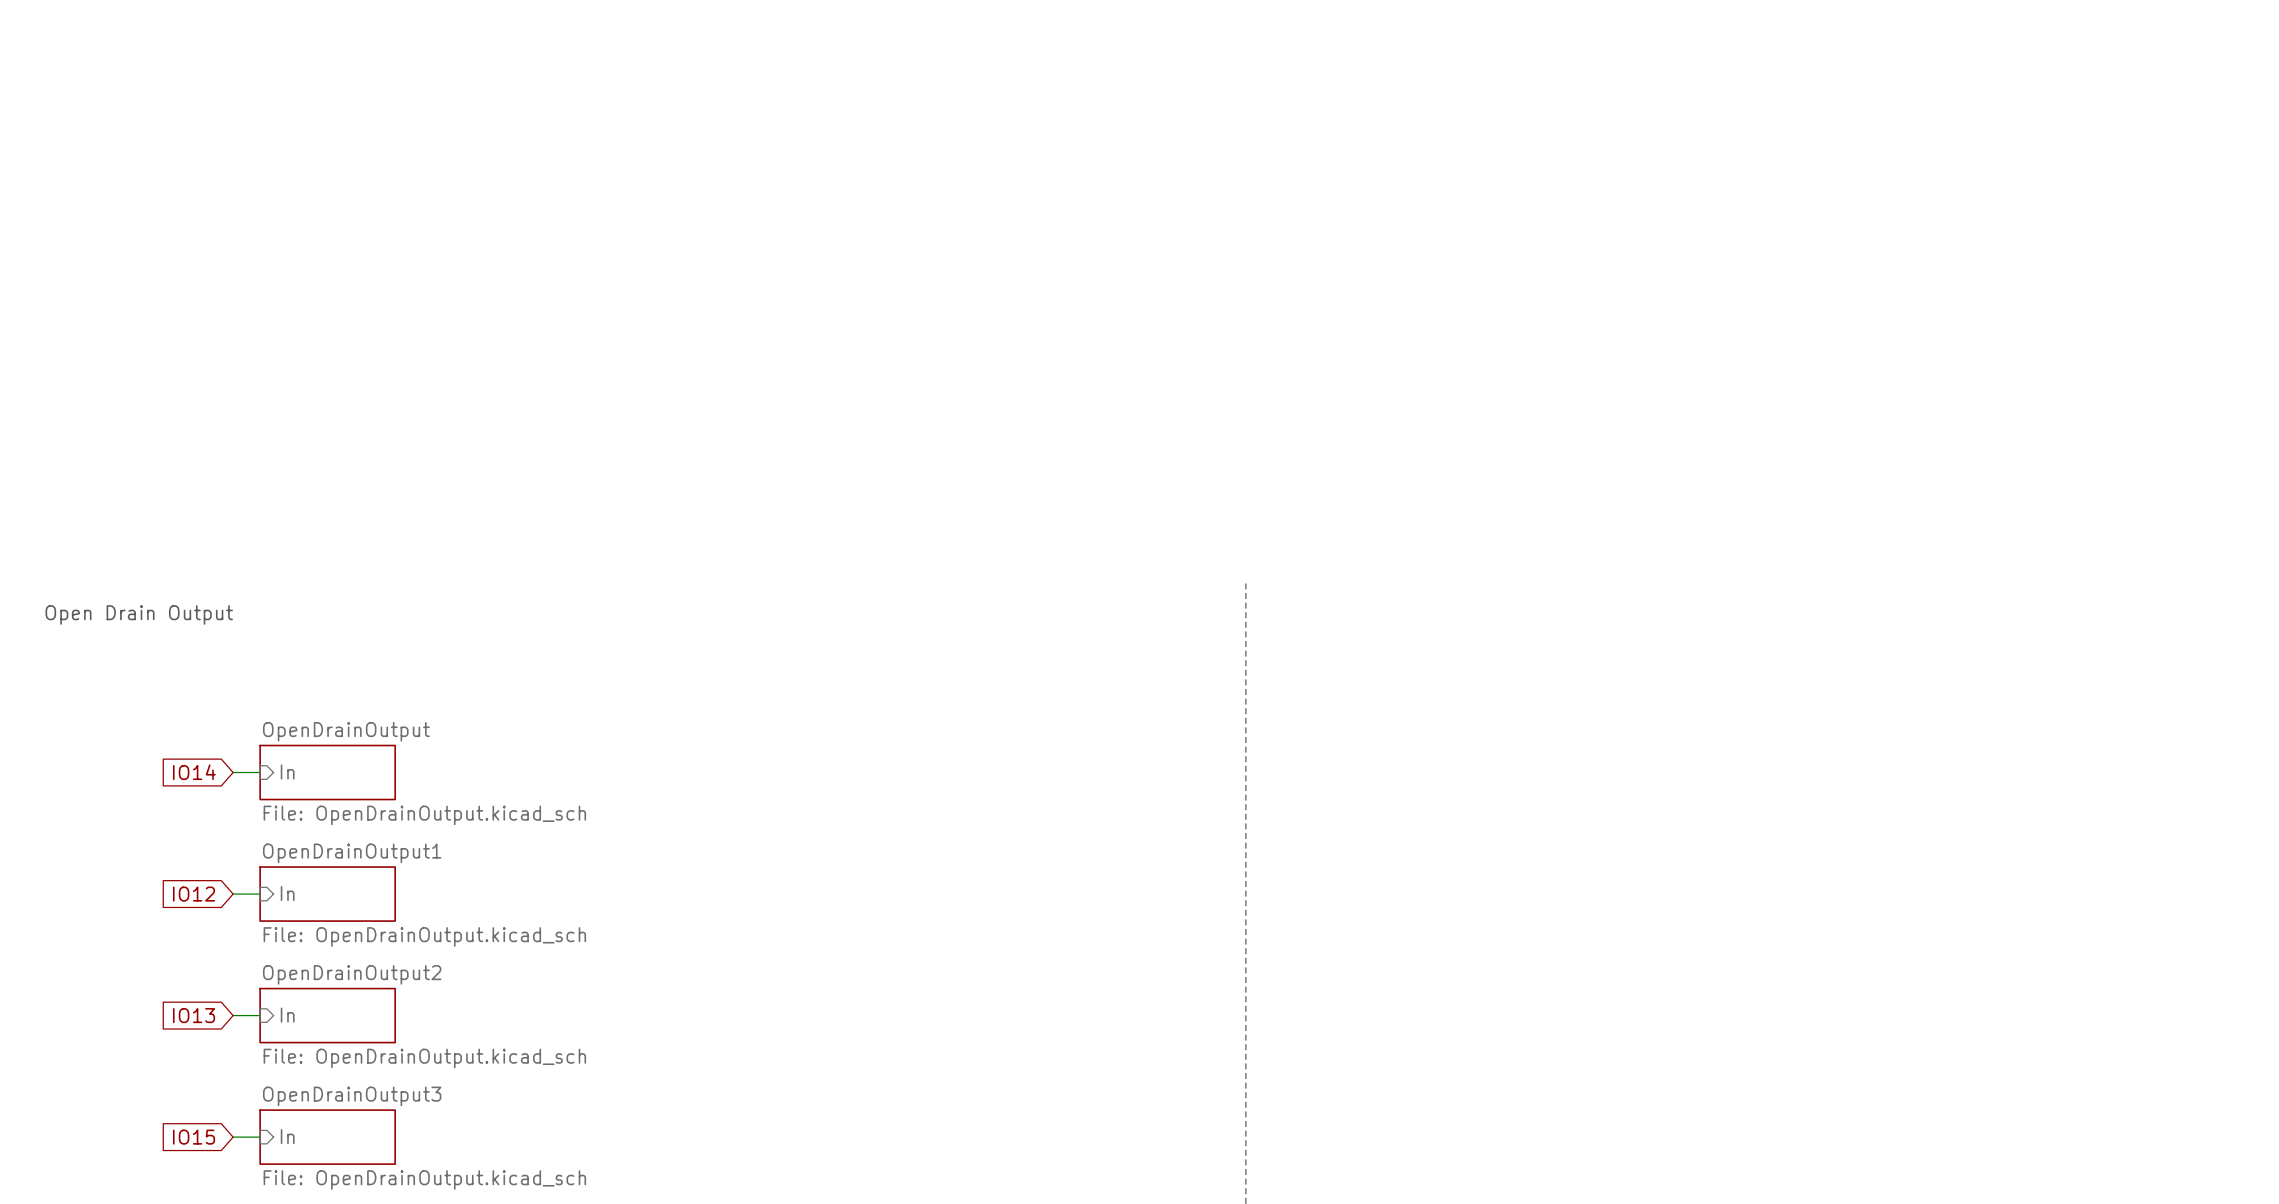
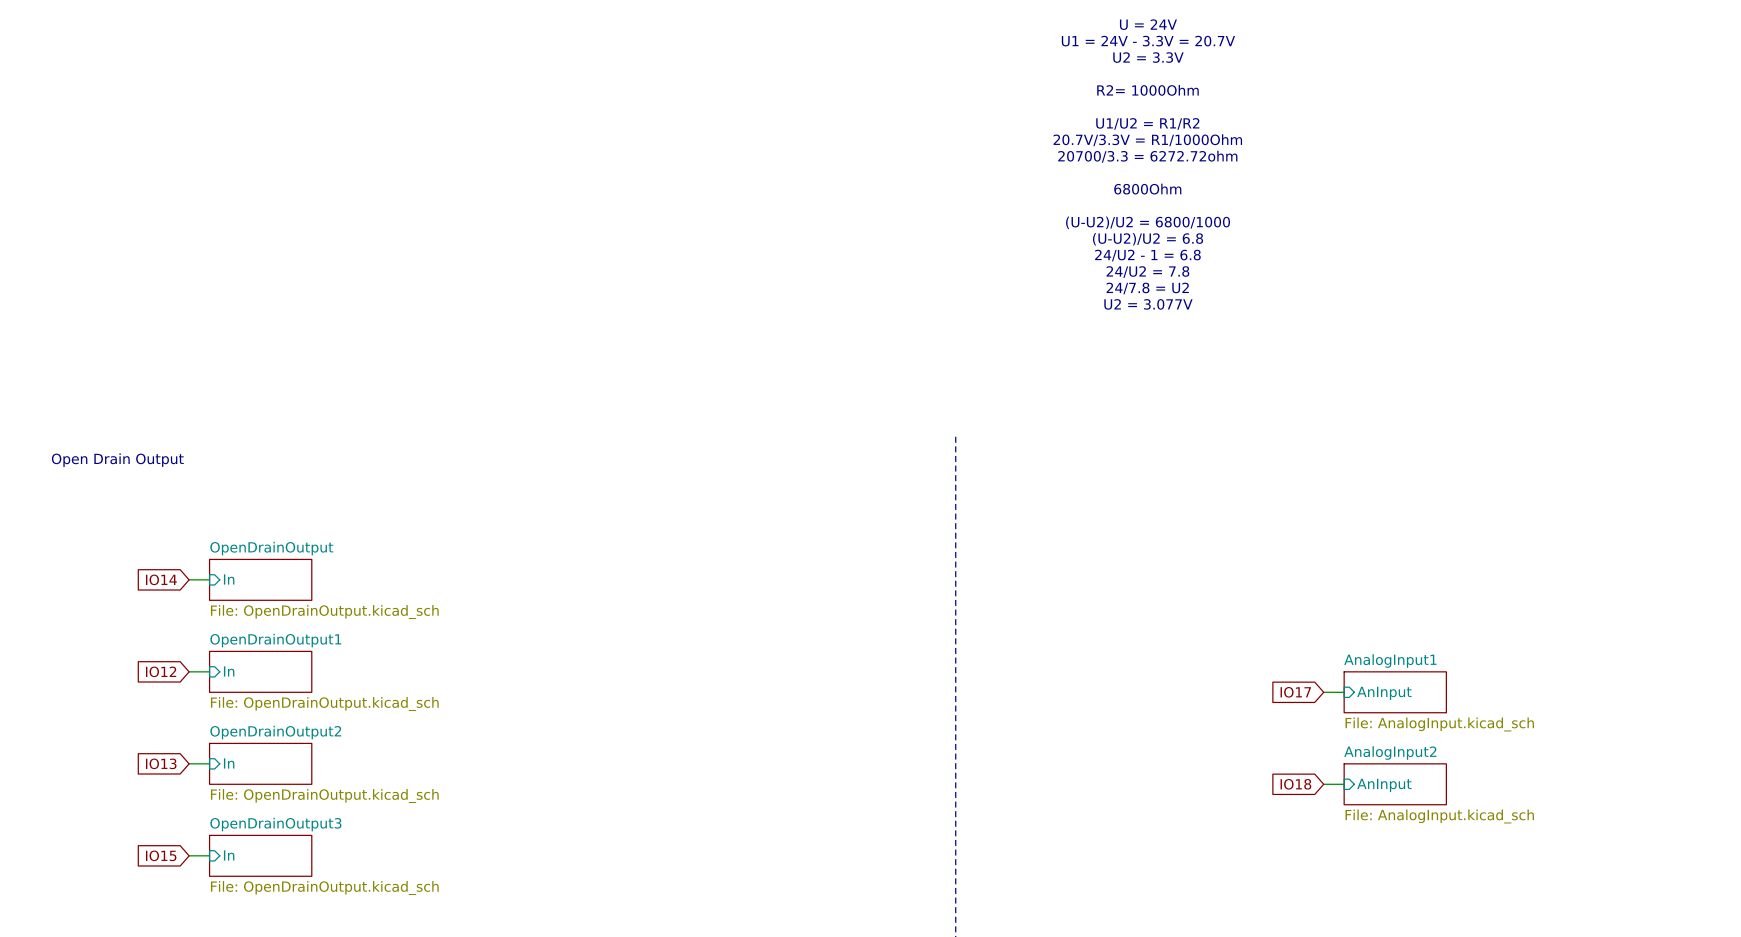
text: none -> U = 24V (1148, 24)
text: none -> U1 = 24V - 3.3V = 20.7V (1148, 41)
text: none -> U2 = 3.3V (1148, 57)
text: none -> R2= 1000Ohm (1147, 90)
text: none -> U1/U2 = R1/R2 (1147, 123)
text: none -> 20.7V/3.3V = R1/1000Ohm (1147, 140)
text: none -> 20700/3.3 = 6272.72ohm (1147, 156)
text: none -> 6800Ohm (1147, 189)
text: none -> (U-U2)/U2 = 6800/1000 (1148, 222)
text: none -> (U-U2)/U2 = 6.8 (1148, 239)
text: none -> 24/U2 - 1 = 6.8 (1147, 255)
text: none -> 24/U2 = 7.8 (1147, 272)
text: none -> 24/7.8 = U2 (1147, 288)
text: none -> U2 = 3.077V (1148, 304)
global label: none -> IO17 (1295, 692)
wire: none -> (1323, 692) (1344, 692)
sheet AnalogInput1: none -> File: AnalogInput.kicad_sch (1395, 692)
sheet pin: none -> AnInput (1384, 693)
global label: none -> IO18 (1295, 784)
wire: none -> (1323, 784) (1344, 784)
sheet AnalogInput2: none -> File: AnalogInput.kicad_sch (1395, 784)
sheet pin: none -> AnInput (1384, 785)

